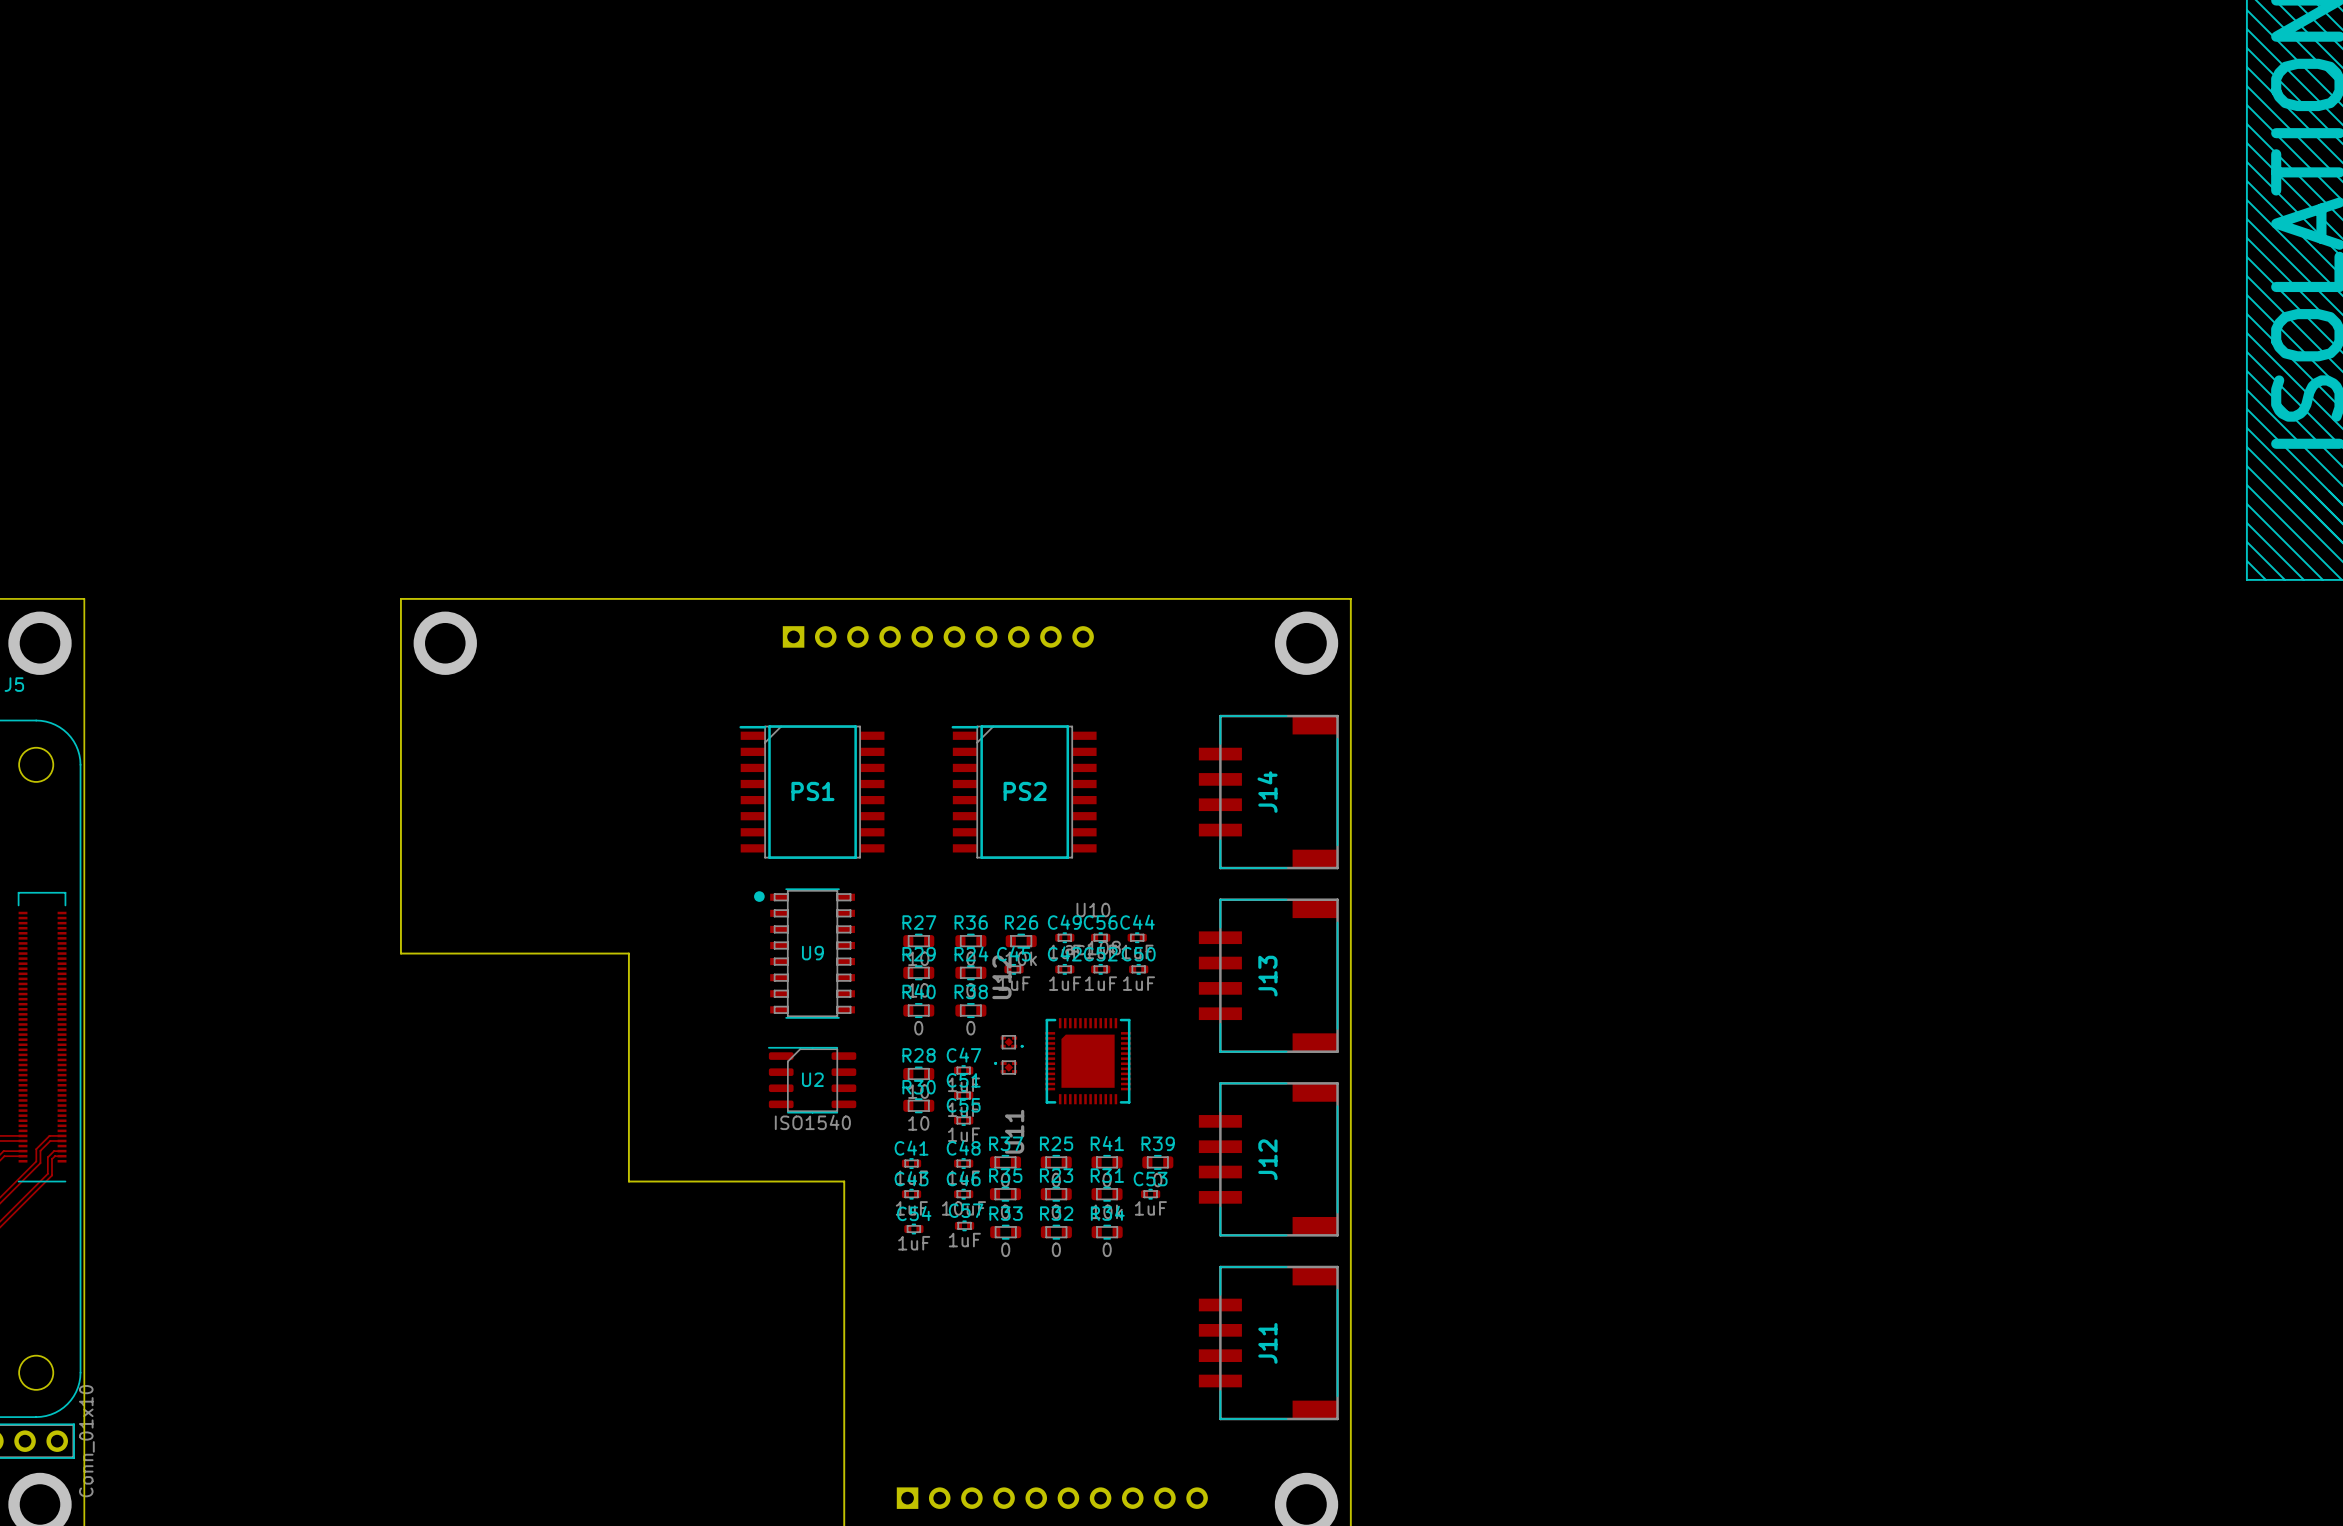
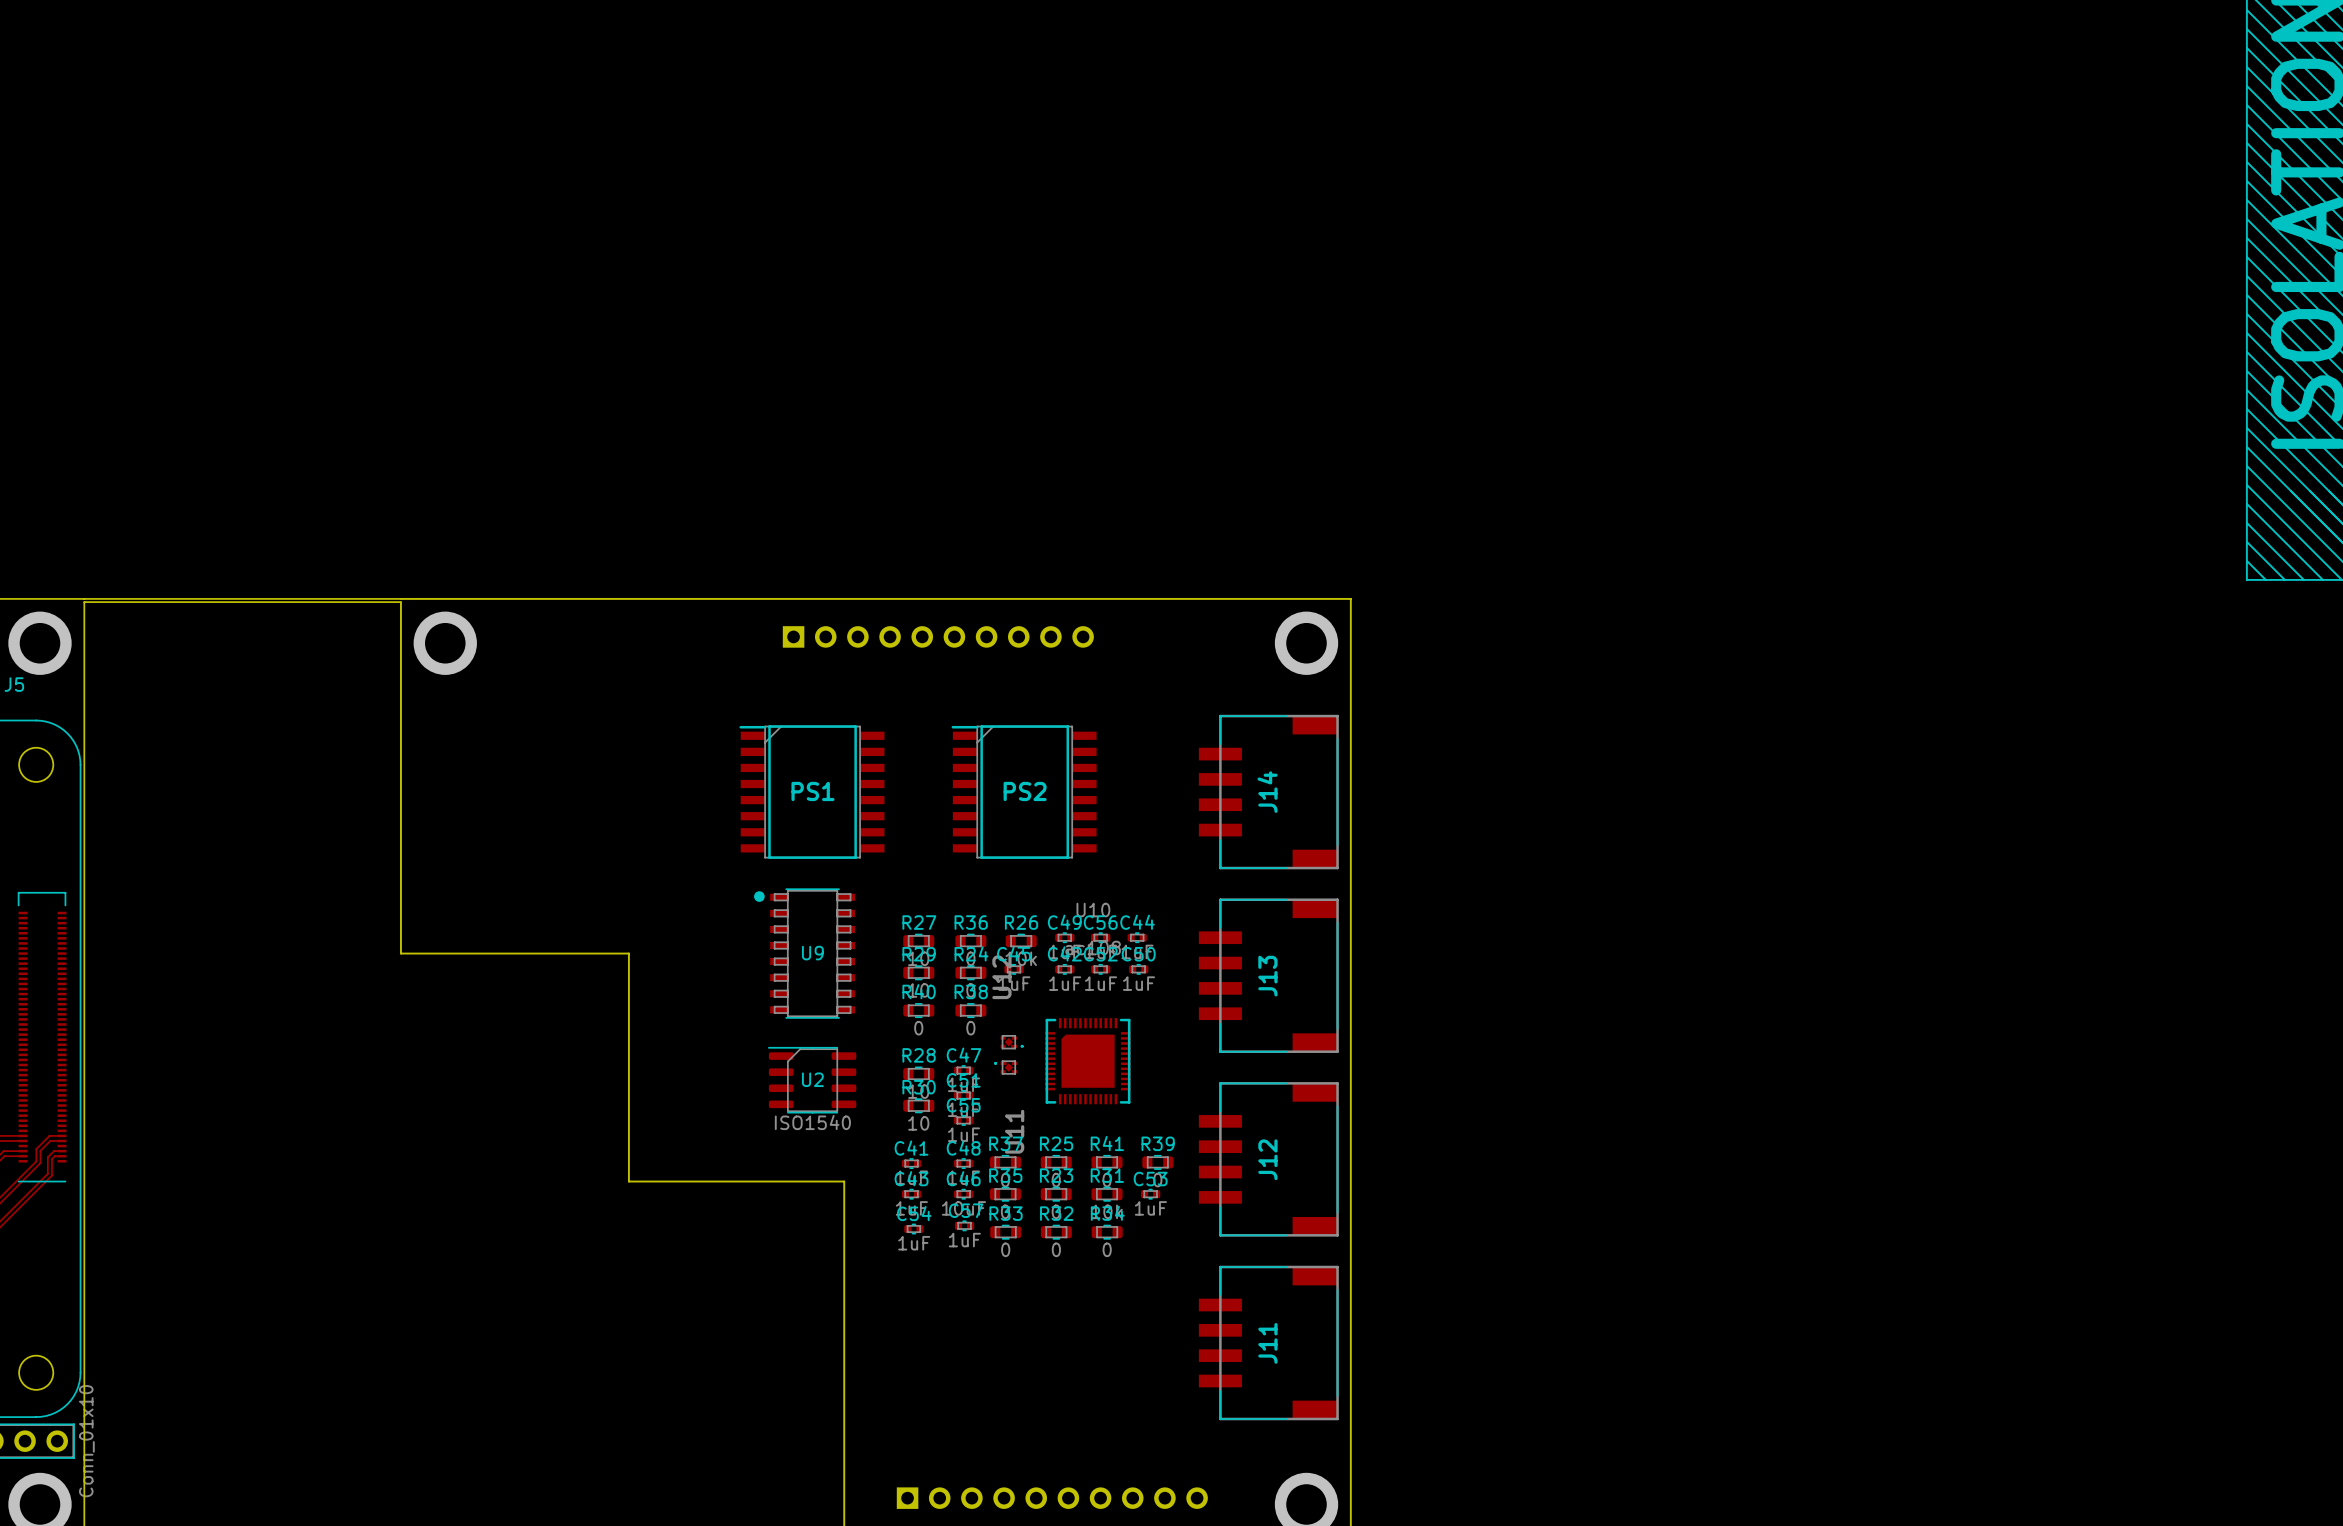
board edge: (84, 598) (84, 602) -> (84, 598) (400, 598)
board edge: (400, 598) (400, 602) -> (84, 602) (400, 602)

